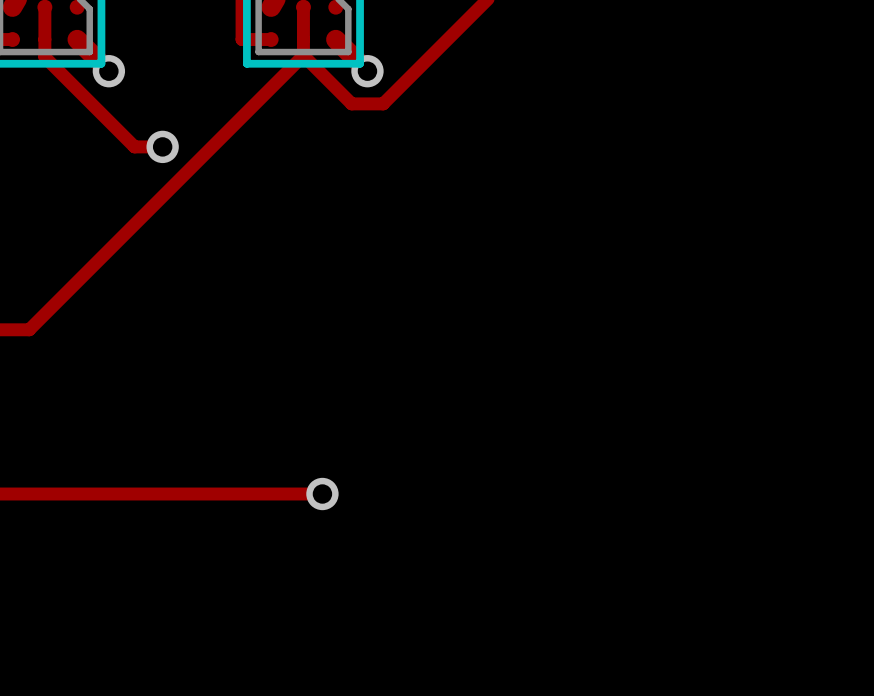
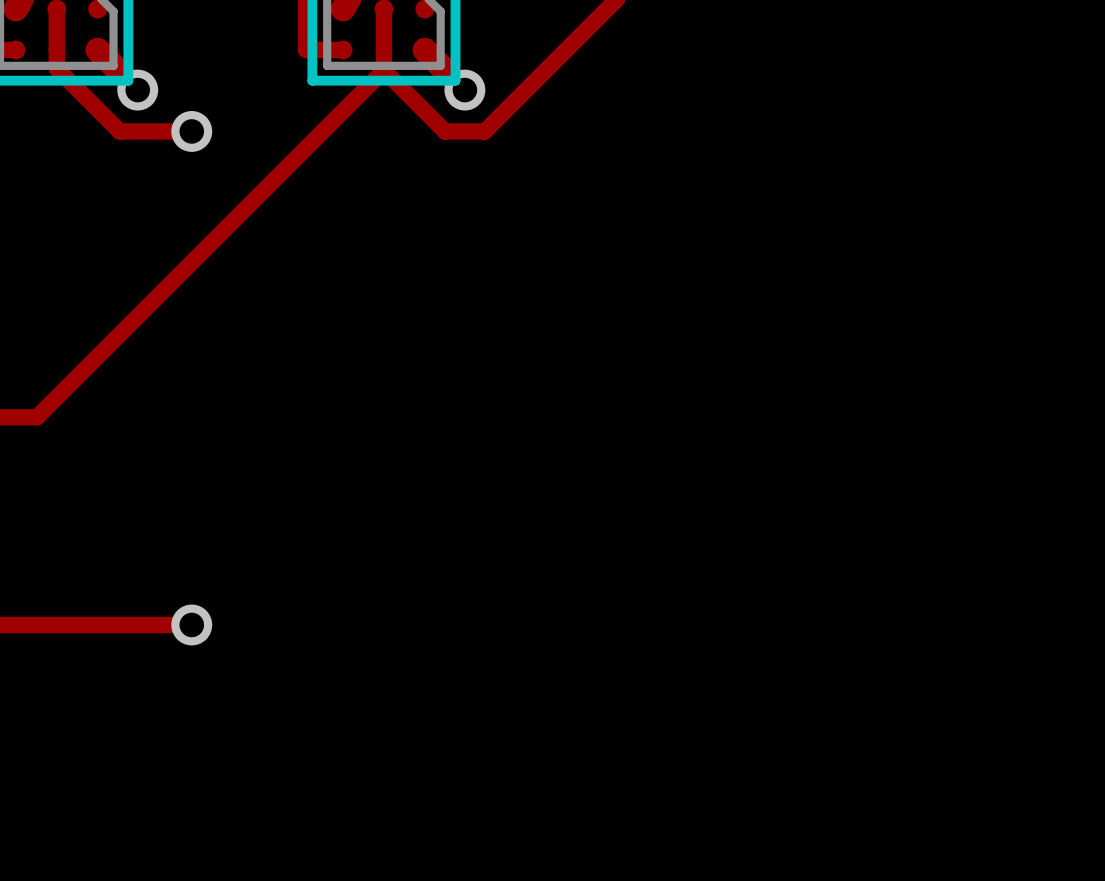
track: (44, 54) (44, 57) (134, 146) (162, 146) -> (56, 68) (119, 131) (191, 131)
via position: (162, 146) -> (191, 131)
track: (151, 494) (322, 494) -> none
via position: (322, 494) -> (191, 624)

